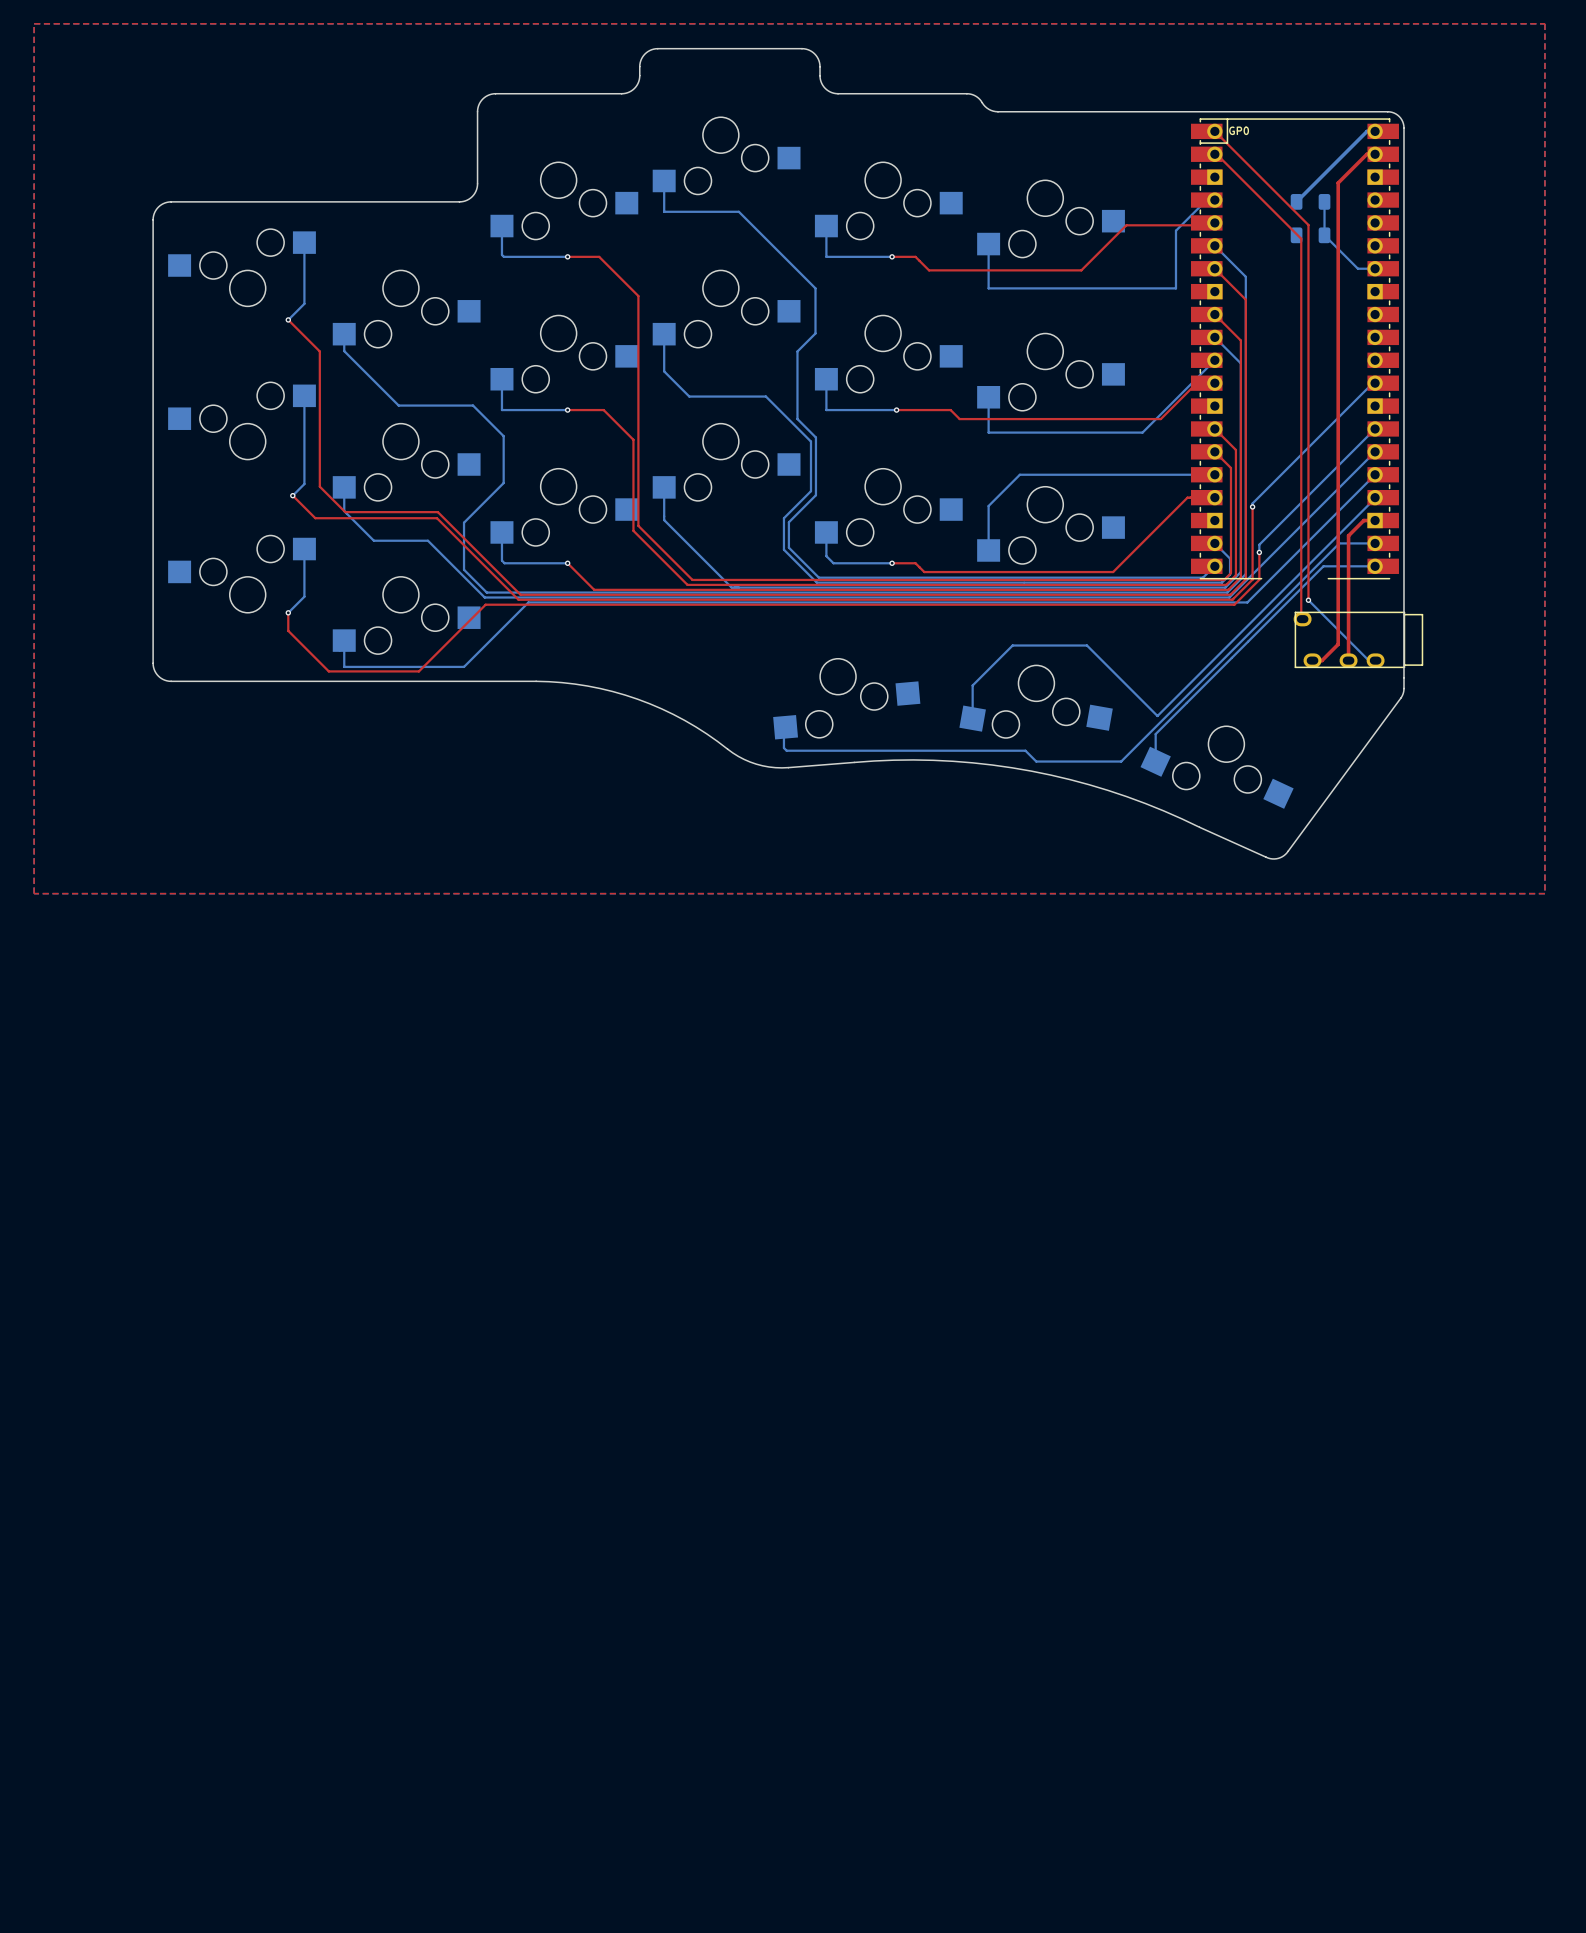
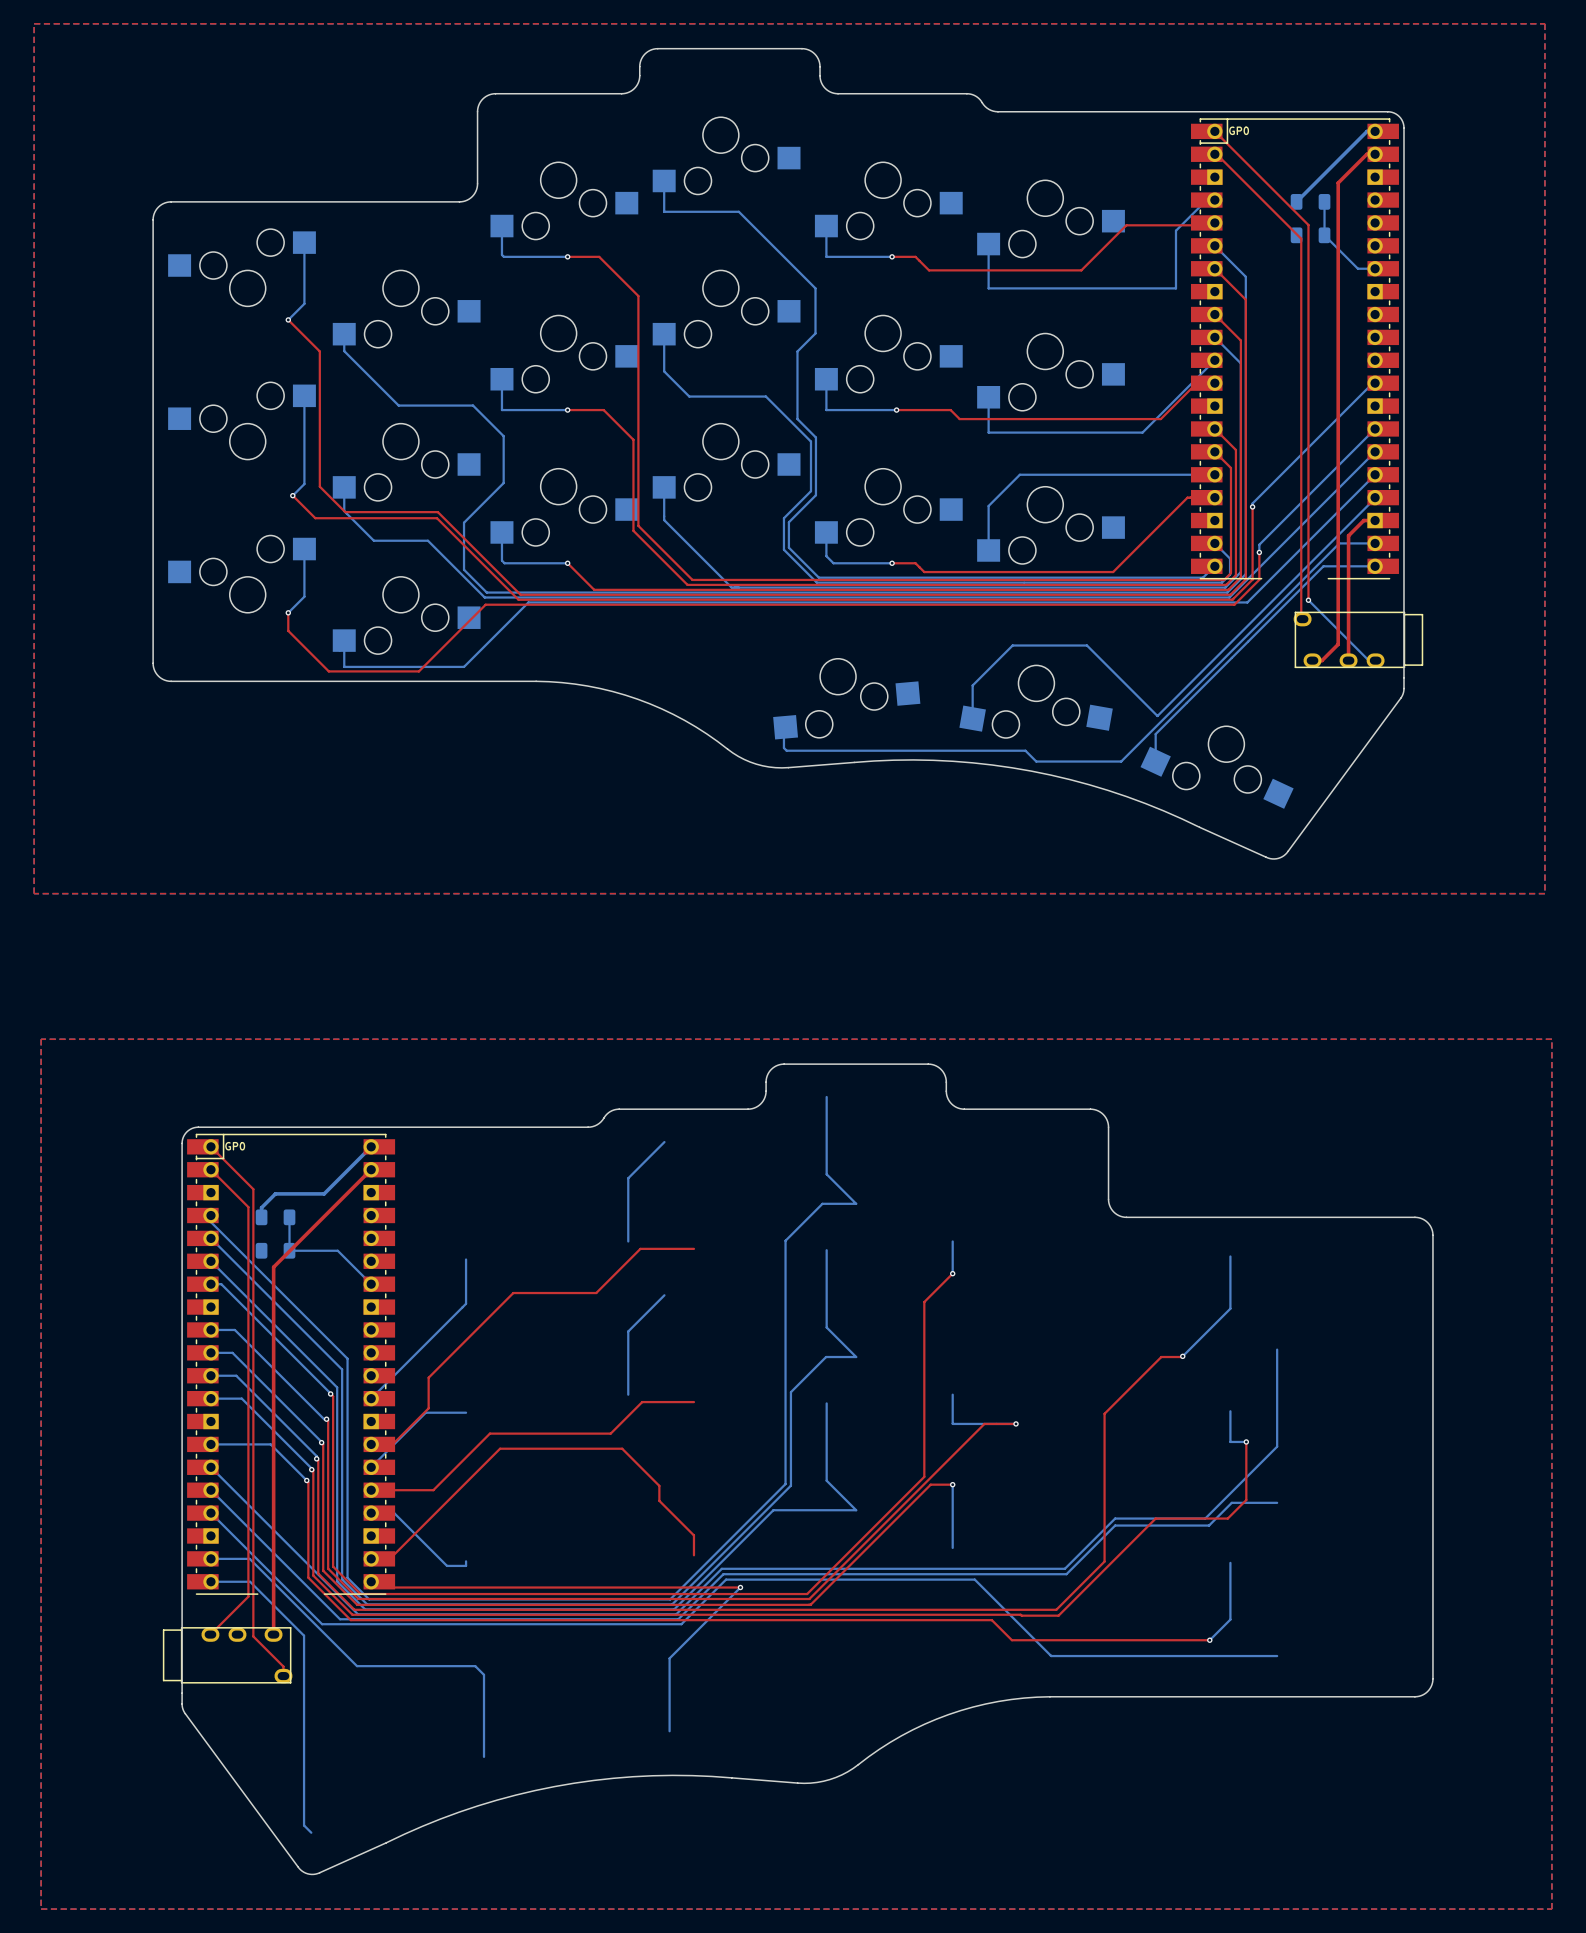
top zone outline: none -> (41, 1039) (1551, 1039) (1551, 1909) (41, 1909) (41, 1039)
board edge: none -> (784, 1064) (930, 1064) (937, 1066) (943, 1072) (948, 1098) (953, 1105) (960, 1108) (1090, 1109) (1098, 1110) (1105, 1117) (1108, 1125) (1108, 1203) (1113, 1212) (1122, 1216) (1414, 1217) (1427, 1222) (1432, 1235) (1432, 1678) (1430, 1688) (1422, 1694) (1414, 1696) (1049, 1696) (998, 1701) (960, 1710) (924, 1724) (890, 1742) (847, 1771) (823, 1781) (804, 1783) (712, 1776) (652, 1775) (593, 1780) (554, 1786) (496, 1800) (459, 1812) (422, 1826) (317, 1873) (303, 1872) (185, 1713) (182, 1705) (182, 1143) (184, 1135) (190, 1129) (198, 1127) (588, 1127) (597, 1124) (608, 1112) (617, 1109) (750, 1109) (757, 1106) (764, 1098) (766, 1078) (770, 1070) (776, 1065) (784, 1064)
bottom track: none -> (826, 1097) (826, 1174) (856, 1203) (822, 1203) (785, 1240) (785, 1484) (670, 1599) (369, 1599) (347, 1577) (347, 1358) (210, 1222) (210, 1215)
bottom track: none -> (664, 1142) (628, 1178) (628, 1241)
top track: none -> (210, 1146) (253, 1189) (253, 1636) (283, 1666) (283, 1676)
bottom track: none -> (371, 1146) (324, 1193) (275, 1193) (261, 1207) (261, 1217)
top track: none -> (210, 1169) (248, 1207) (248, 1596) (210, 1634)
top track: none -> (371, 1169) (273, 1267) (273, 1634)
part: none -> (275, 1217)
bottom track: none -> (289, 1217) (289, 1250) (337, 1250) (371, 1284)
bottom track: none -> (210, 1238) (342, 1369) (342, 1579) (367, 1604) (672, 1604) (790, 1485) (790, 1392) (826, 1357) (856, 1357) (826, 1327) (826, 1250)
bottom track: none -> (952, 1241) (952, 1273)
top track: none -> (693, 1248) (640, 1248) (596, 1293) (513, 1293) (428, 1377) (428, 1408) (392, 1444) (371, 1444)
part: none -> (275, 1250)
bottom track: none -> (1230, 1256) (1230, 1308) (1182, 1356)
bottom track: none -> (466, 1259) (466, 1303) (371, 1398)
bottom track: none -> (210, 1261) (337, 1387) (337, 1581) (365, 1609) (674, 1609) (773, 1510) (856, 1510) (826, 1480) (826, 1403)
top track: none -> (952, 1273) (924, 1302) (924, 1476) (807, 1594) (360, 1594) (333, 1566) (333, 1396) (330, 1393)
via: none -> (952, 1273)
bottom track: none -> (210, 1284) (221, 1284) (330, 1393)
bottom track: none -> (664, 1295) (628, 1331) (628, 1394)
bottom track: none -> (210, 1329) (234, 1329) (324, 1419) (326, 1419)
bottom track: none -> (1277, 1349) (1277, 1446) (1205, 1518) (1115, 1518) (1064, 1568) (721, 1568) (676, 1614) (357, 1614) (210, 1467)
bottom track: none -> (210, 1352) (232, 1352) (321, 1442)
top track: none -> (1182, 1356) (1161, 1357) (1104, 1413) (1104, 1561) (1056, 1609) (354, 1609) (318, 1573) (318, 1460) (316, 1458)
via: none -> (1182, 1356)
part: none -> (291, 1364)
bottom track: none -> (210, 1375) (236, 1375) (316, 1456) (316, 1458)
via: none -> (330, 1393)
bottom track: none -> (952, 1394) (952, 1423) (1016, 1423)
bottom track: none -> (210, 1398) (241, 1398) (311, 1469)
top track: none -> (693, 1402) (642, 1402) (610, 1433) (489, 1433) (433, 1490) (371, 1490)
bottom track: none -> (1230, 1411) (1230, 1441) (1246, 1441)
bottom track: none -> (466, 1412) (425, 1412) (371, 1467)
top track: none -> (326, 1419) (328, 1420) (328, 1568) (358, 1598) (809, 1598) (984, 1423) (1016, 1423)
via: none -> (326, 1419)
via: none -> (1016, 1423)
top track: none -> (1246, 1441) (1246, 1500) (1227, 1518) (1155, 1518) (1058, 1615) (352, 1614) (313, 1575) (313, 1470) (311, 1469)
via: none -> (1246, 1441)
top track: none -> (321, 1442) (323, 1444) (323, 1570) (357, 1604) (810, 1604) (930, 1484) (952, 1484)
via: none -> (321, 1442)
bottom track: none -> (210, 1444) (270, 1444) (306, 1480)
via: none -> (316, 1458)
via: none -> (311, 1469)
top track: none -> (306, 1480) (308, 1482) (308, 1577) (350, 1620) (991, 1620) (1011, 1640) (1209, 1640)
via: none -> (306, 1480)
bottom track: none -> (952, 1484) (952, 1547)
via: none -> (952, 1484)
bottom track: none -> (210, 1490) (340, 1619) (678, 1619) (723, 1574) (1066, 1574) (1115, 1525) (1209, 1525) (1231, 1502) (1277, 1502)
bottom track: none -> (210, 1513) (322, 1624) (681, 1624) (726, 1579) (974, 1579) (1051, 1656) (1277, 1656)
bottom track: none -> (371, 1513) (394, 1513) (447, 1565) (466, 1565) (466, 1561)
top track: none -> (693, 1555) (693, 1535) (659, 1500) (659, 1485) (622, 1448) (500, 1448) (389, 1558) (371, 1558)
bottom track: none -> (210, 1558) (249, 1558) (357, 1666) (475, 1666) (484, 1674) (484, 1756)
bottom track: none -> (1230, 1562) (1230, 1619) (1209, 1640)
bottom track: none -> (210, 1581) (250, 1581) (304, 1635) (304, 1825) (311, 1832)
top track: none -> (371, 1581) (376, 1587) (740, 1587)
bottom track: none -> (740, 1587) (669, 1658) (669, 1731)
via: none -> (740, 1587)
via: none -> (1209, 1640)
part: none -> (227, 1655)

